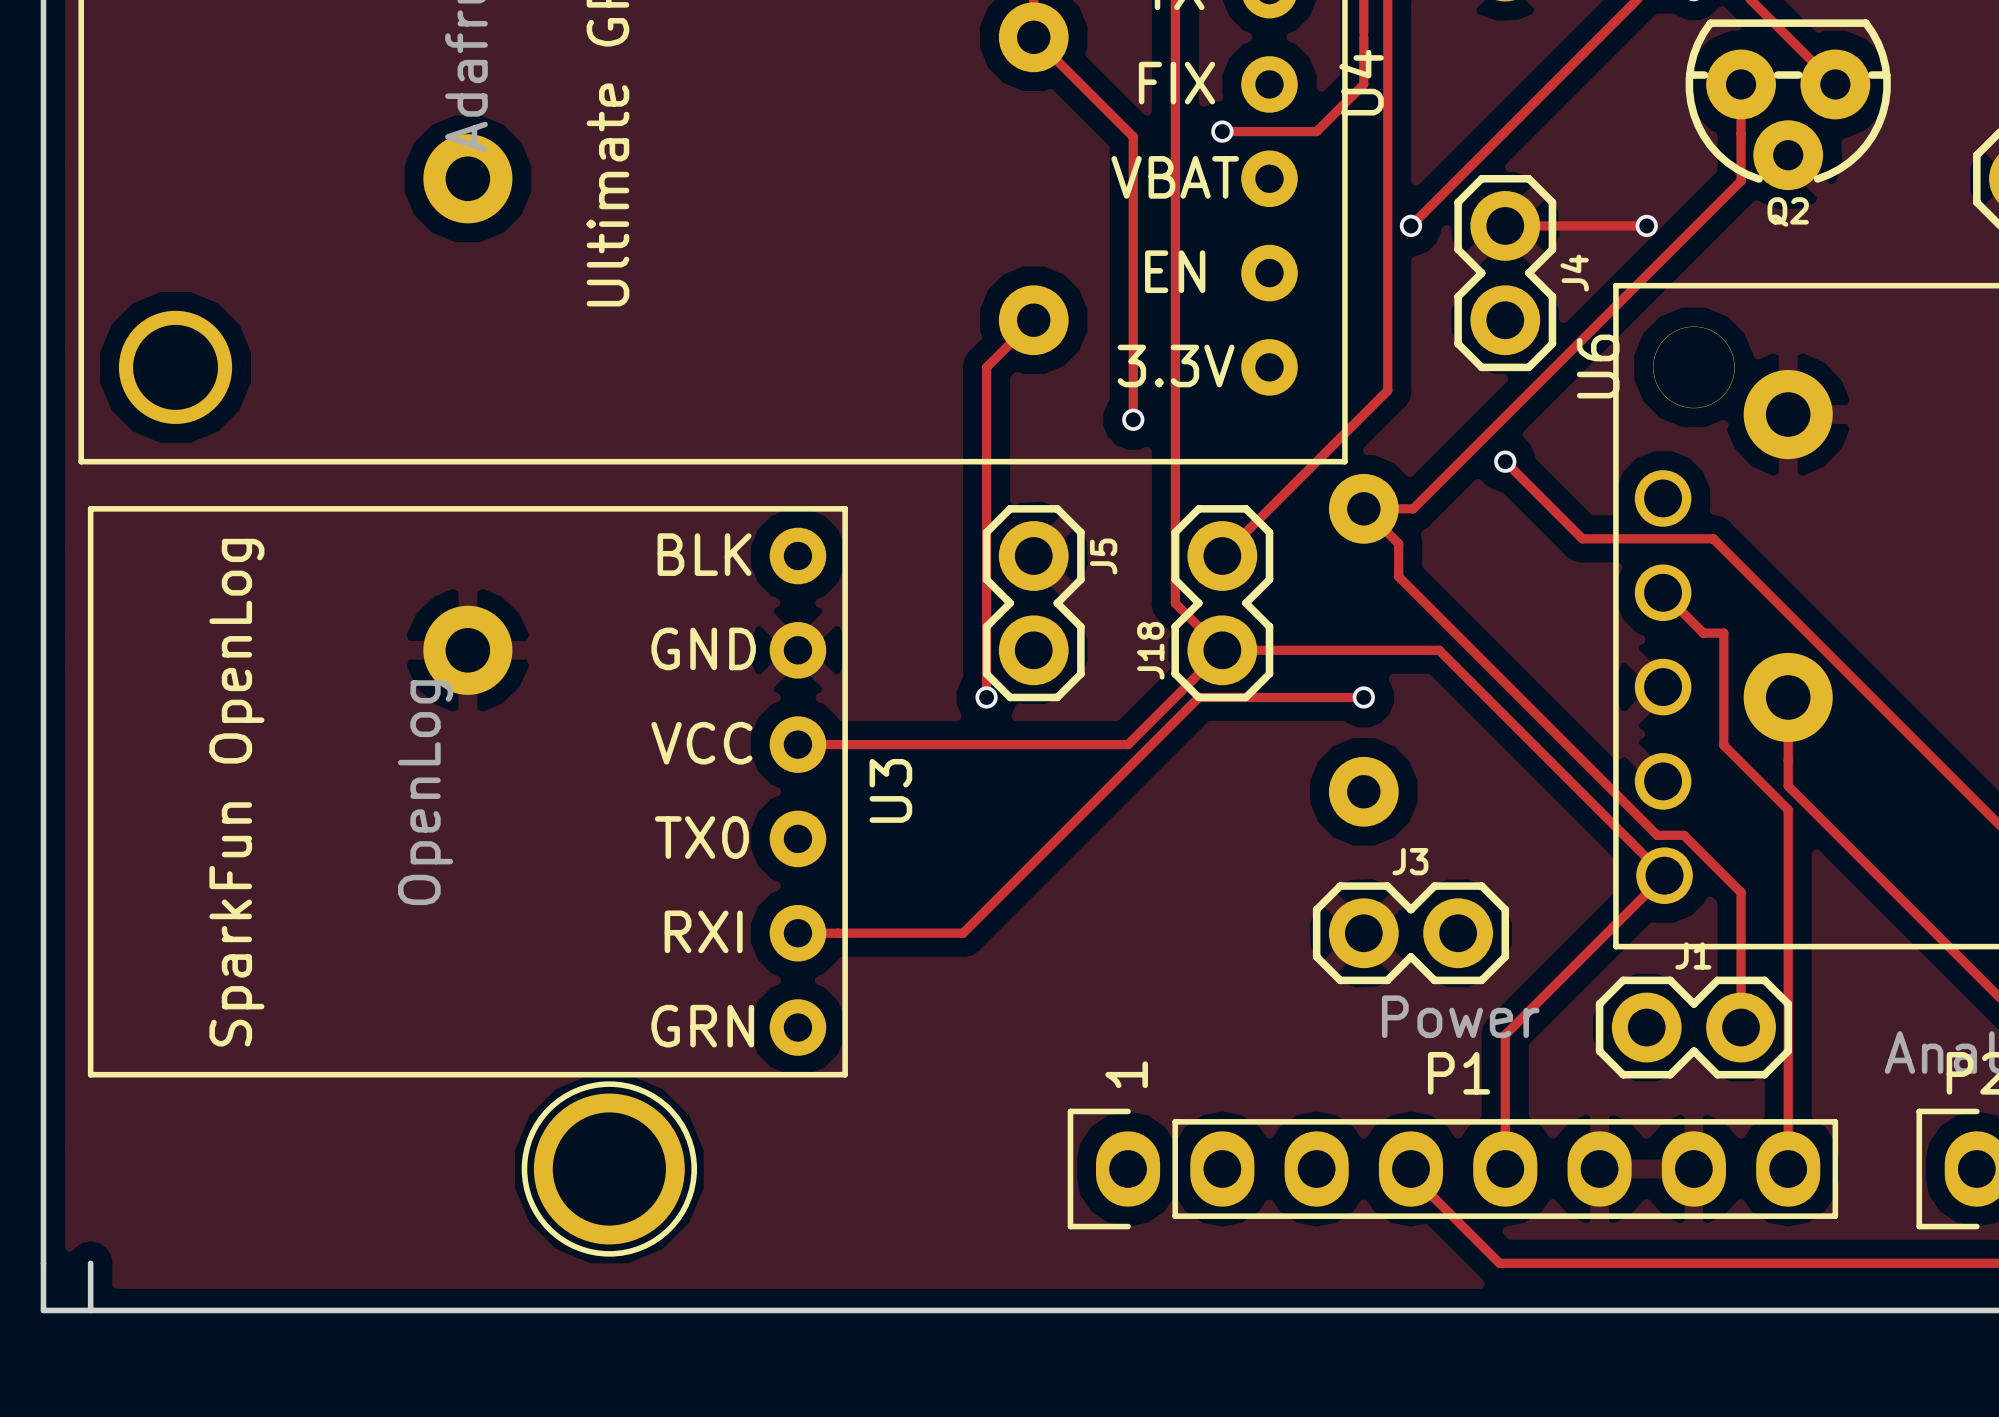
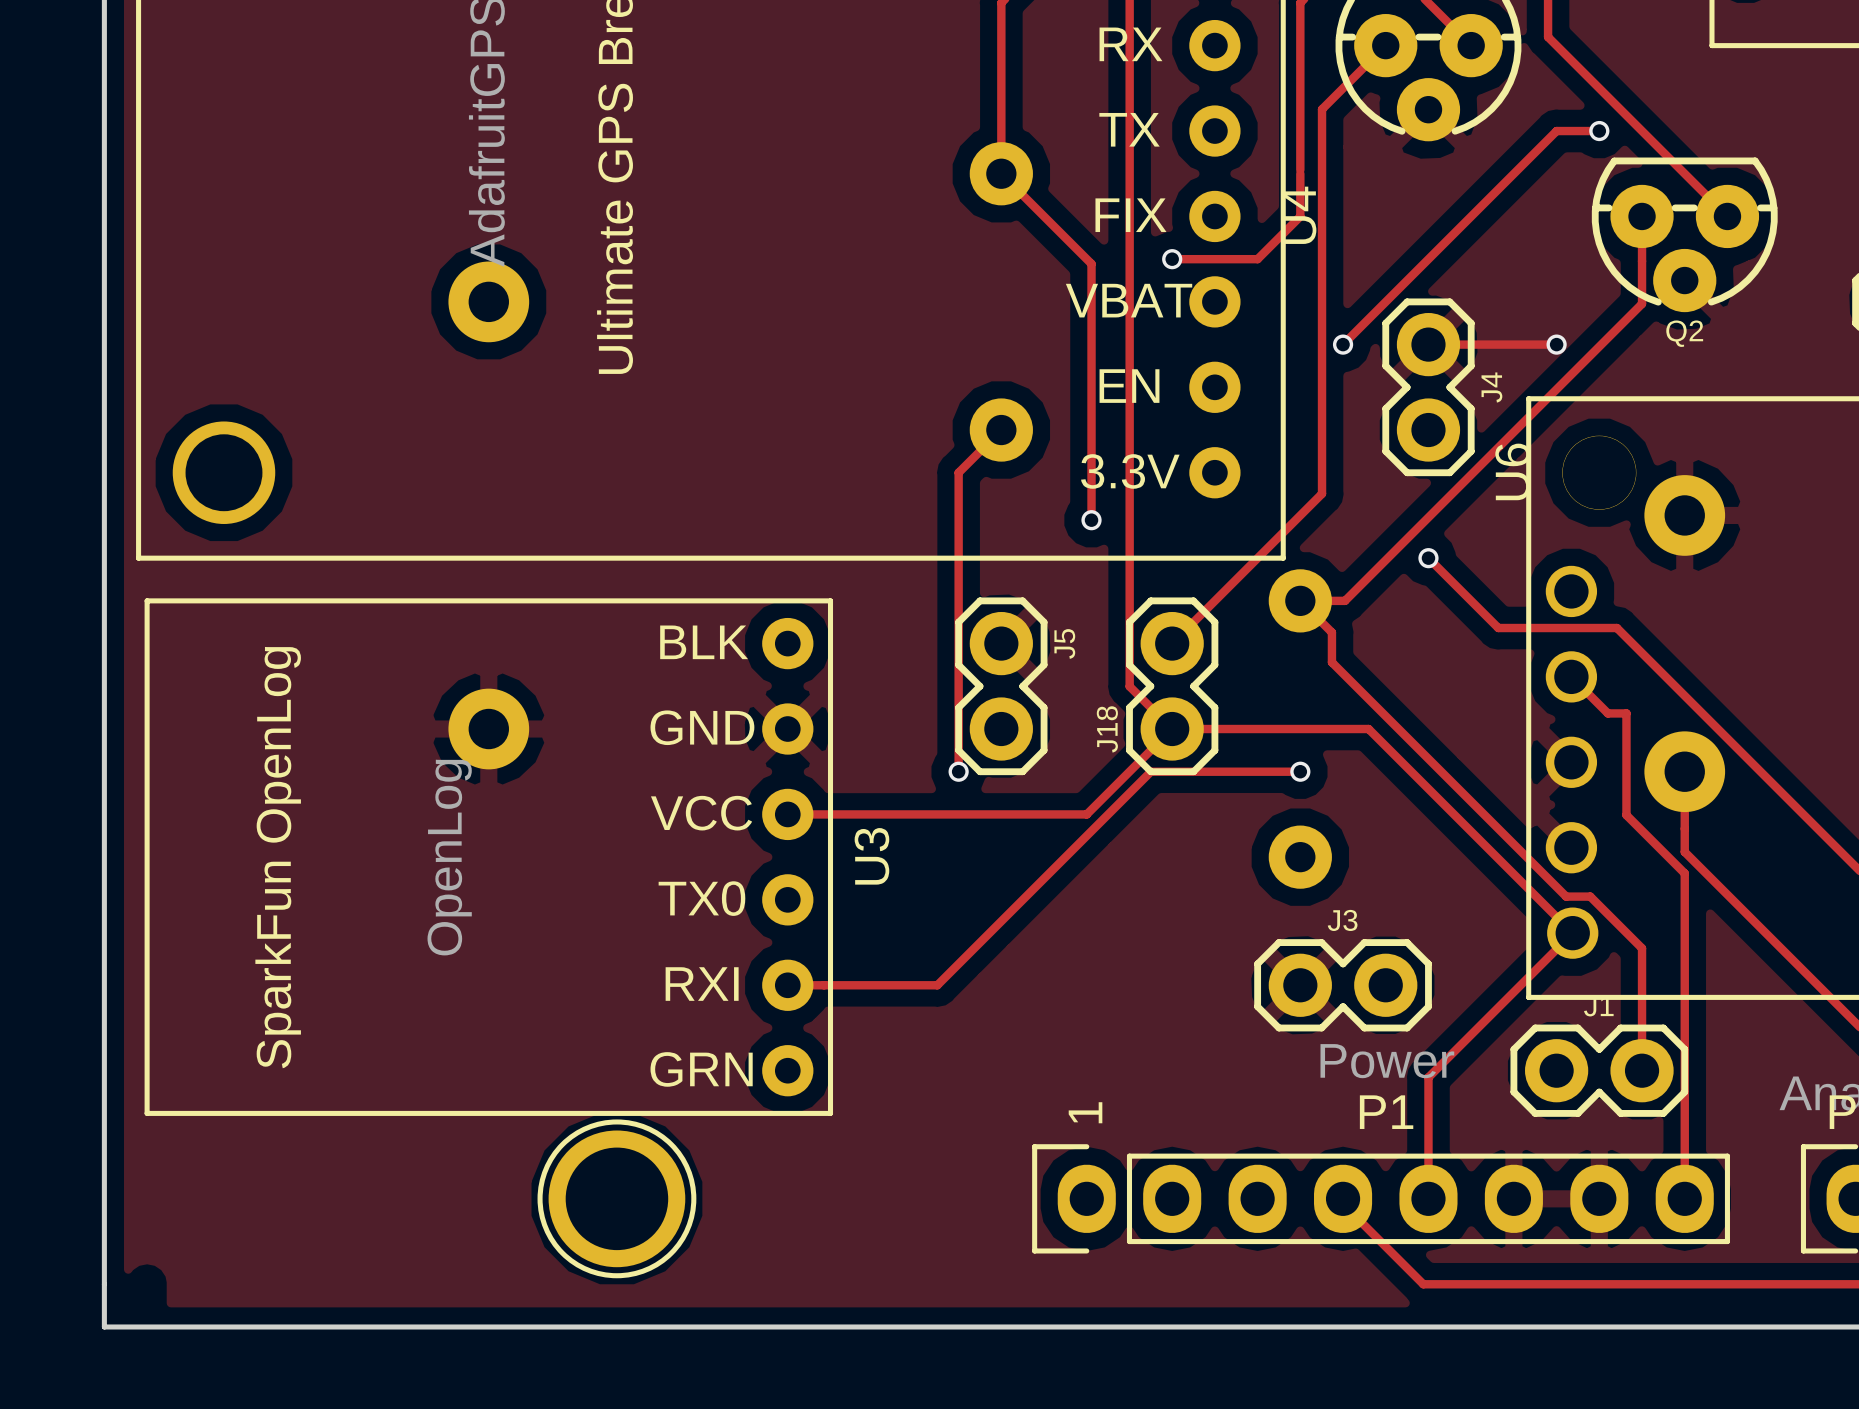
board edge: (90, 1263) (90, 1310) -> none

